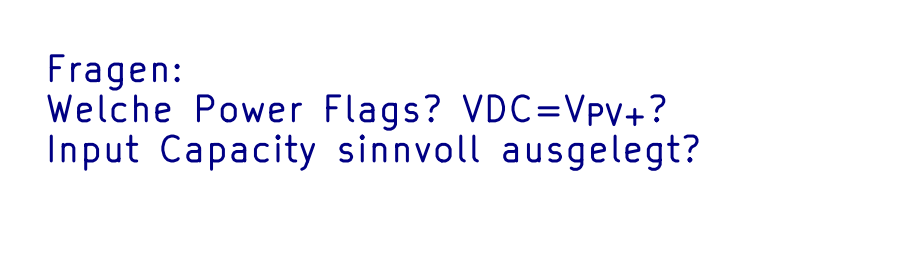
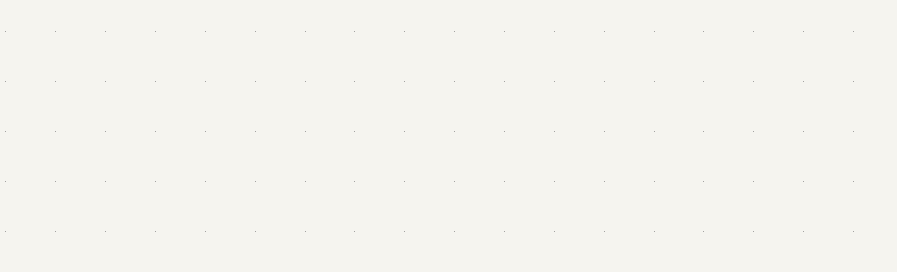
text: Fragen: (114, 72) -> none
text: Welche Power Flags? VDC=VPV+? (356, 112) -> none
text: Input Capacity sinnvoll ausgelegt? (374, 152) -> none

